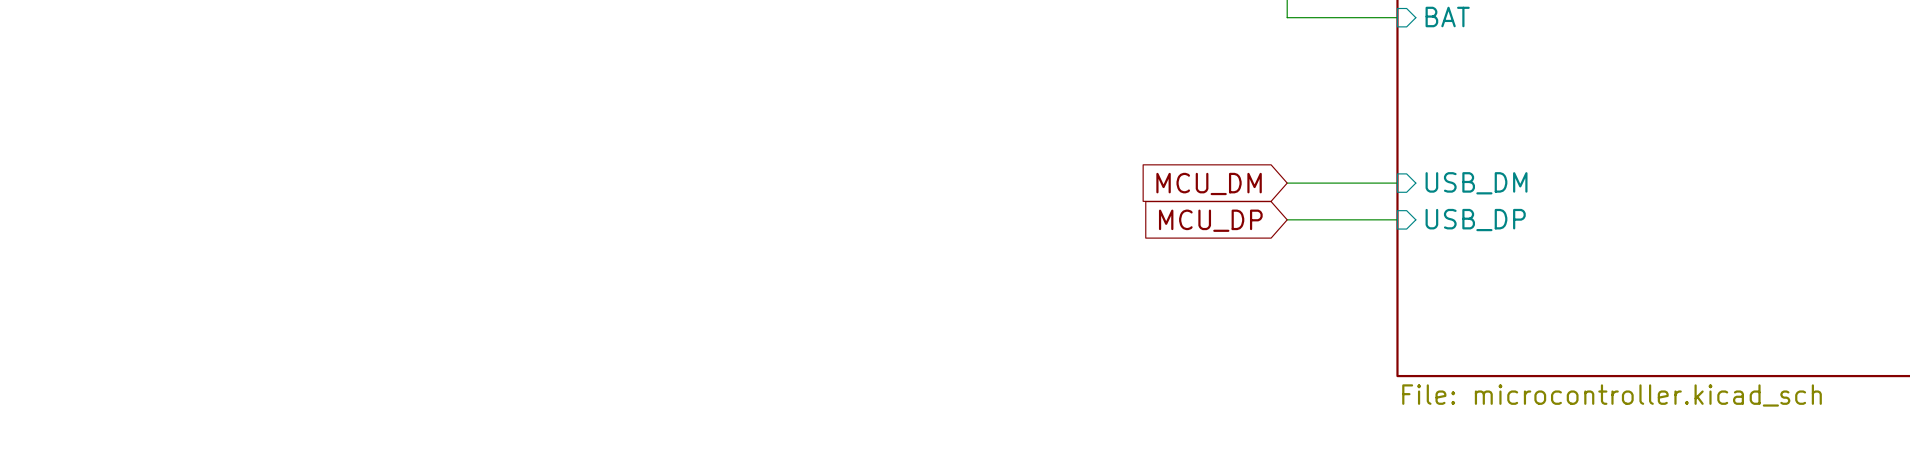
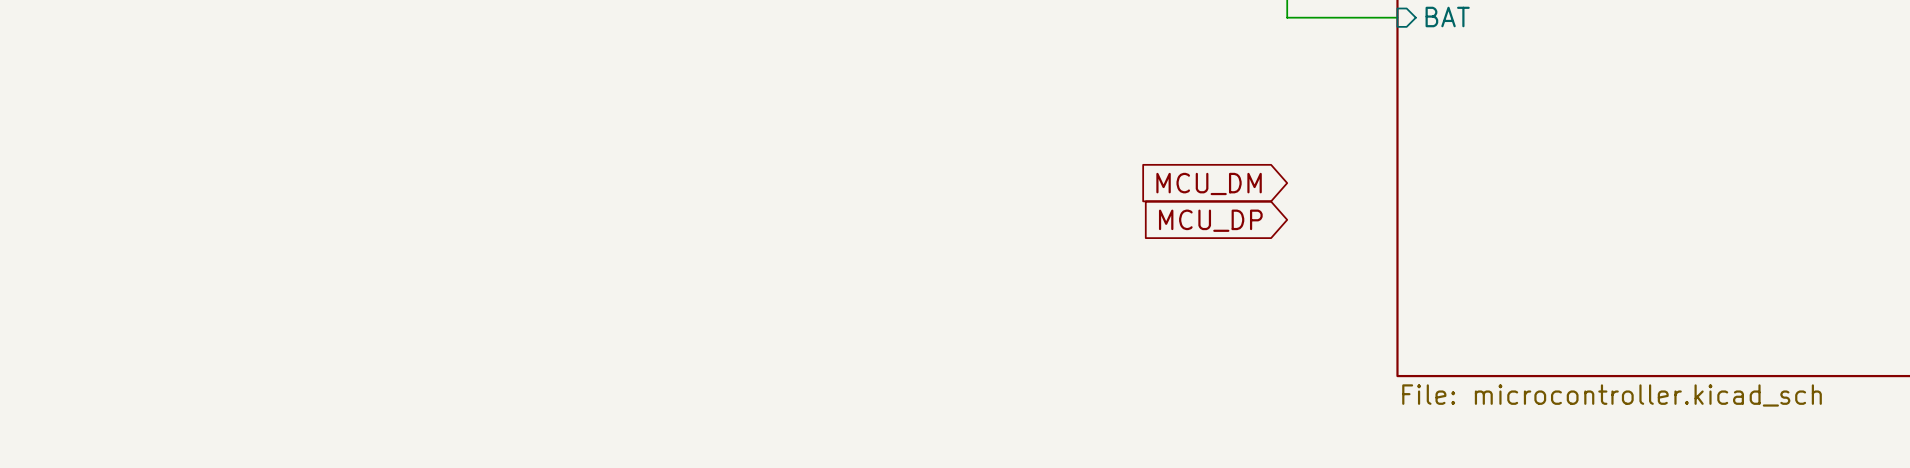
wire: (1287, 183) (1397, 183) -> none
sheet pin: USB_DM (1476, 183) -> none
wire: (1287, 219) (1397, 219) -> none
sheet pin: USB_DP (1475, 220) -> none

